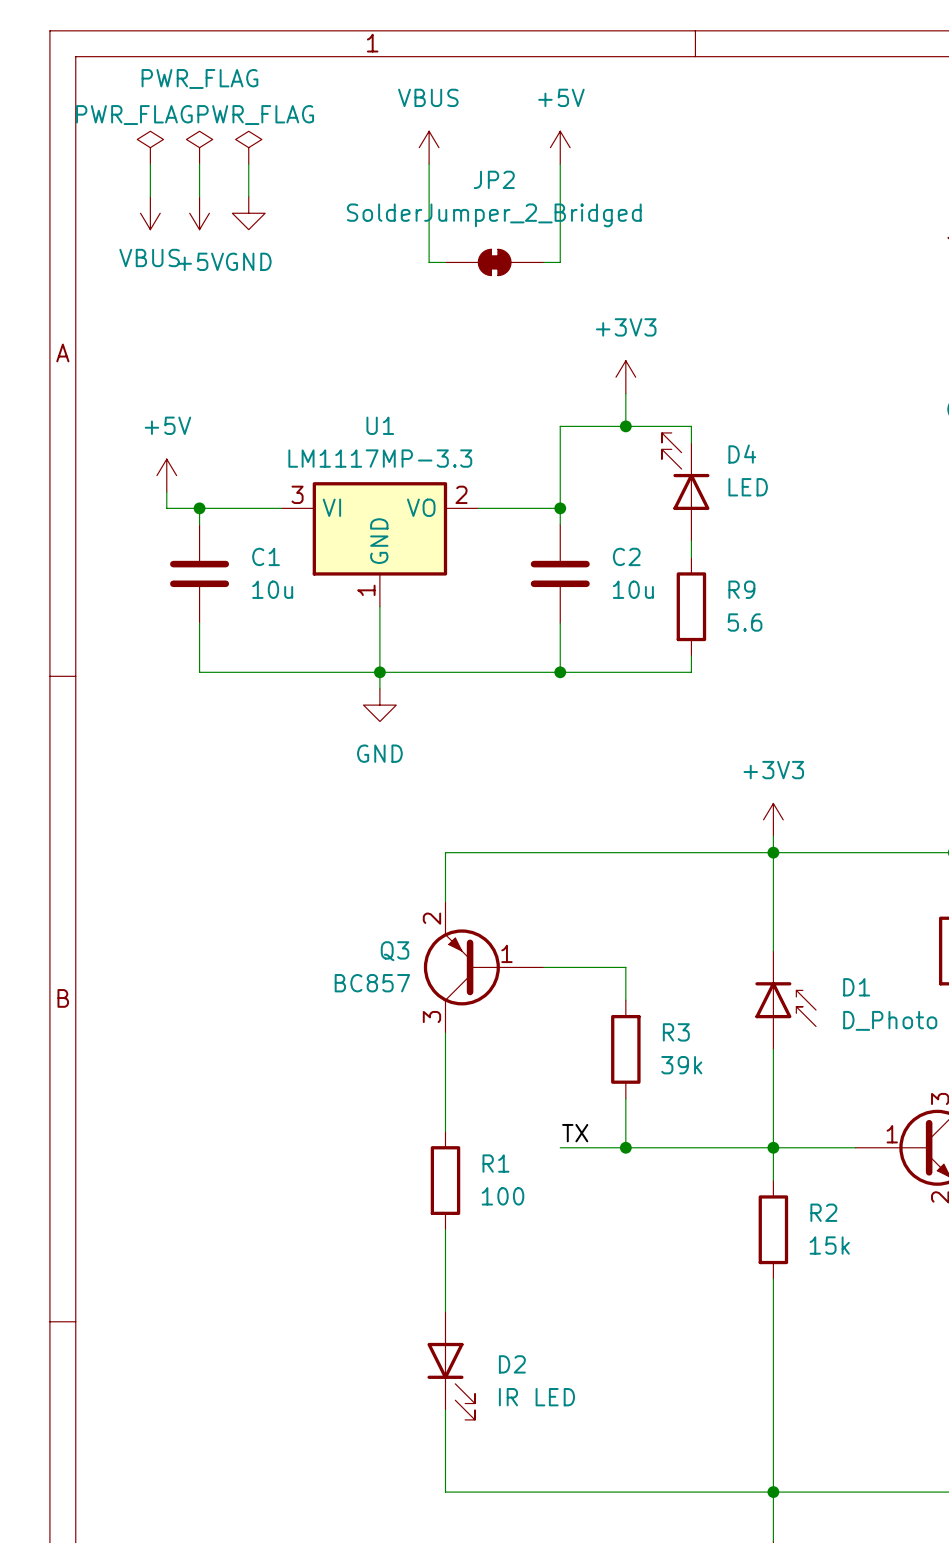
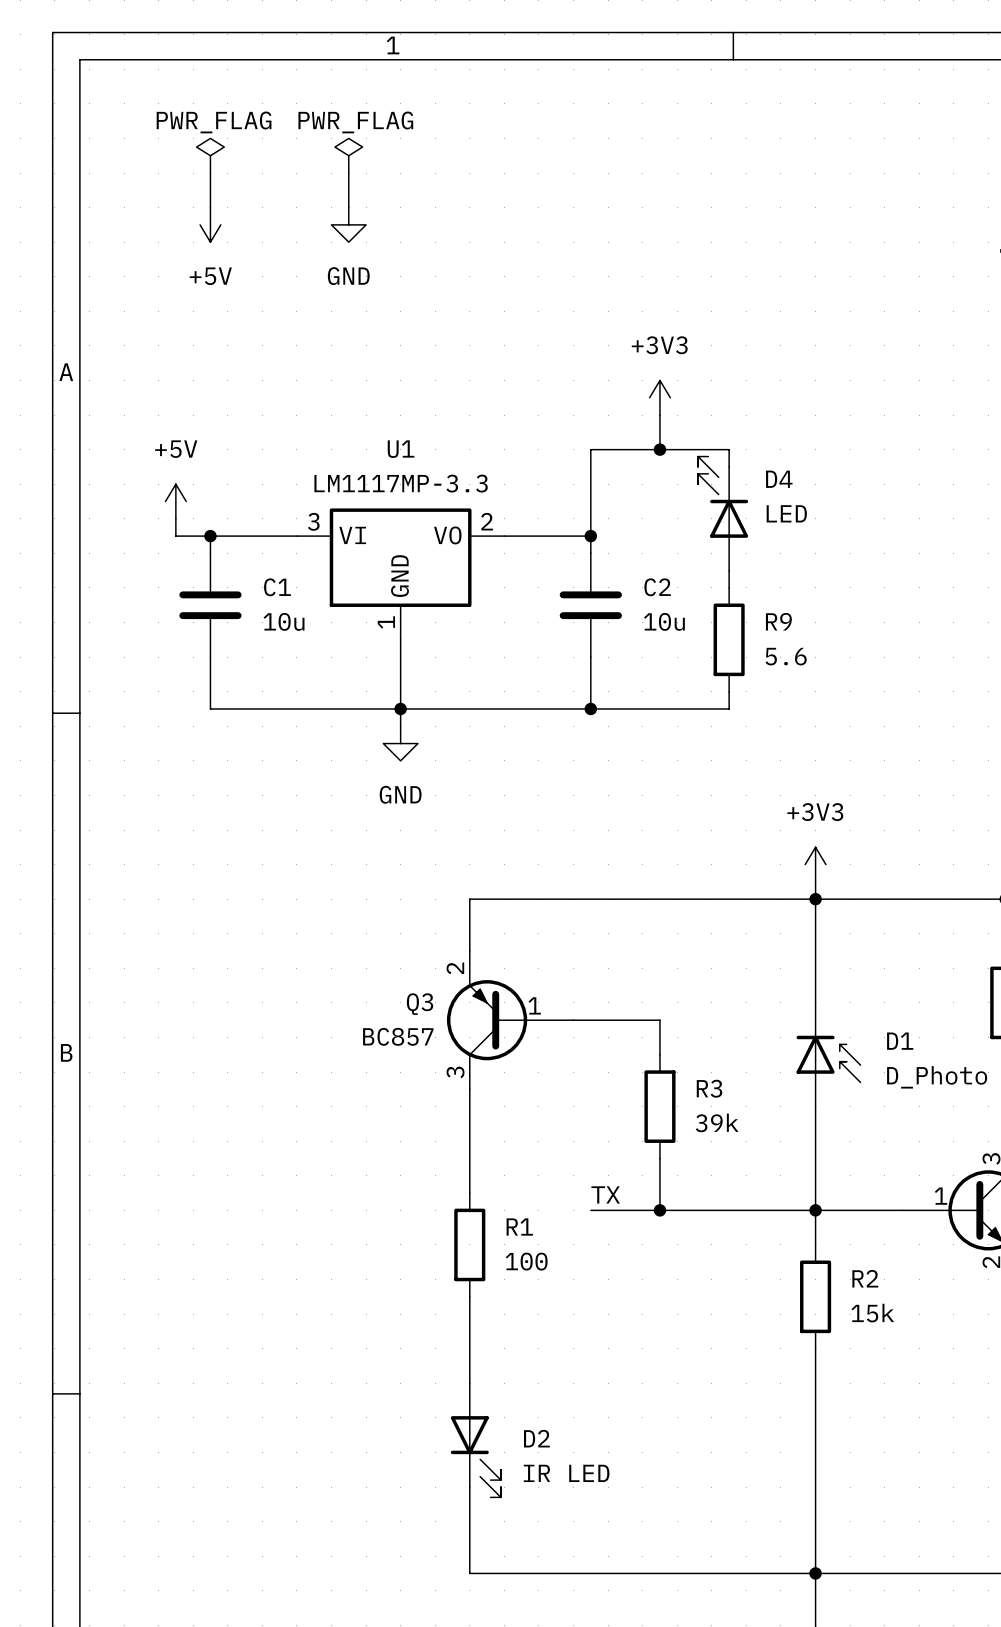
power symbol text position: PWR_FLAG (199, 78) -> PWR_FLAG (214, 122)
power symbol: PWR_FLAG (150, 147) -> none
power symbol position: PWR_FLAG (248, 147) -> PWR_FLAG (348, 155)
power symbol: VBUS (429, 147) -> none
power symbol: +5V (560, 147) -> none
wire: (150, 164) (150, 196) -> none
wire: (248, 164) (248, 196) -> (348, 173) (348, 207)
wire: (429, 164) (429, 262) (445, 262) -> none
wire: (560, 164) (560, 262) (543, 262) -> none
power symbol: VBUS (150, 213) -> none
power symbol position: GND (248, 213) -> GND (348, 224)
JP2: SolderJumper_2_Bridged (494, 262) -> none

